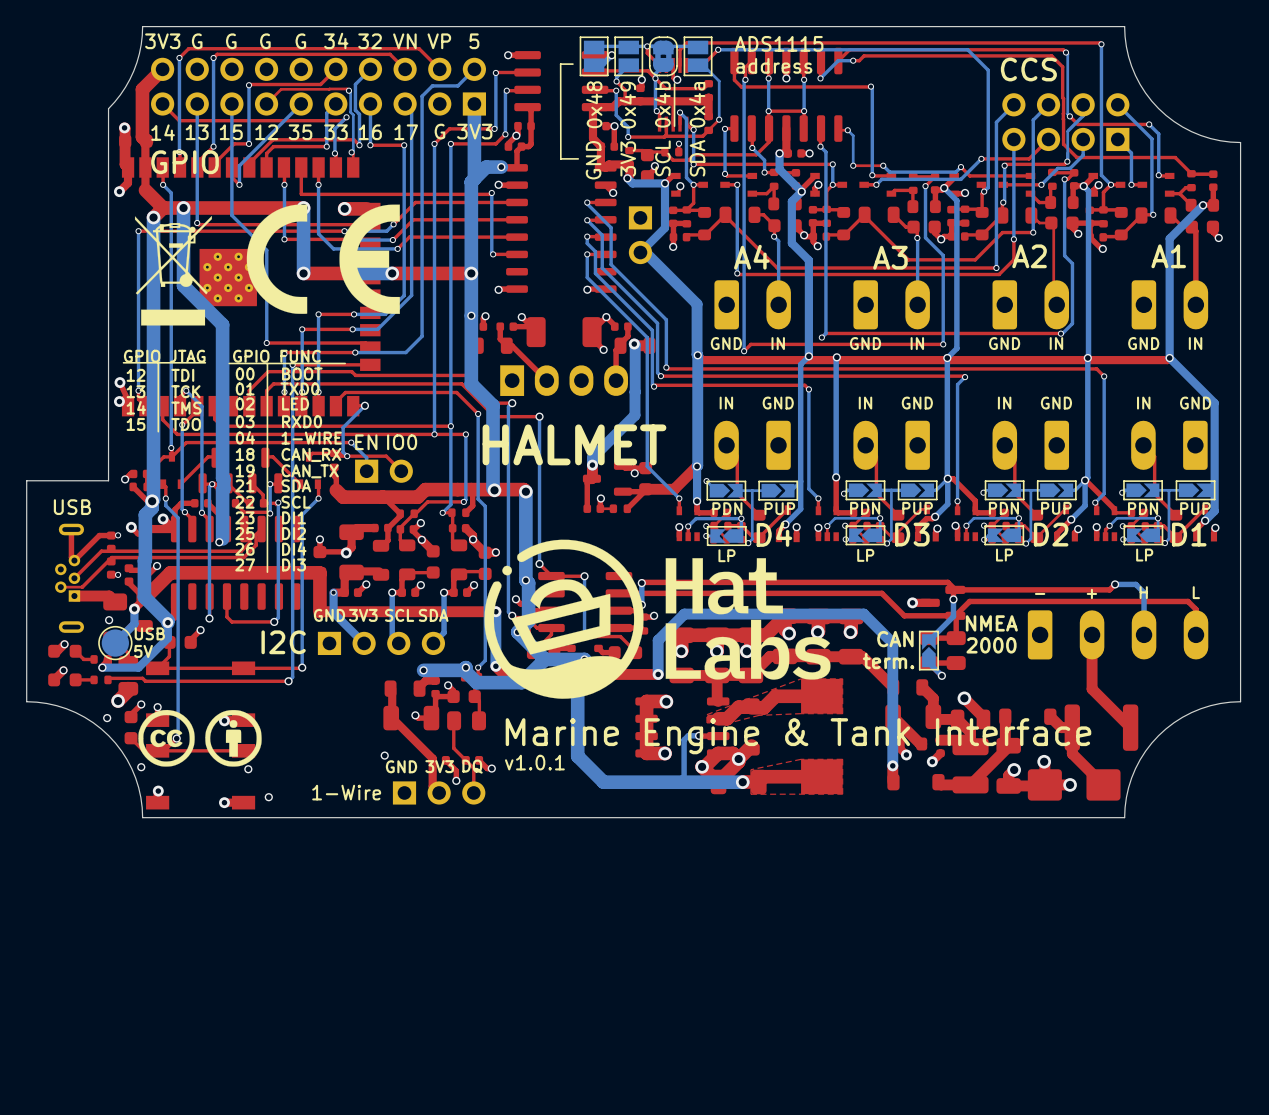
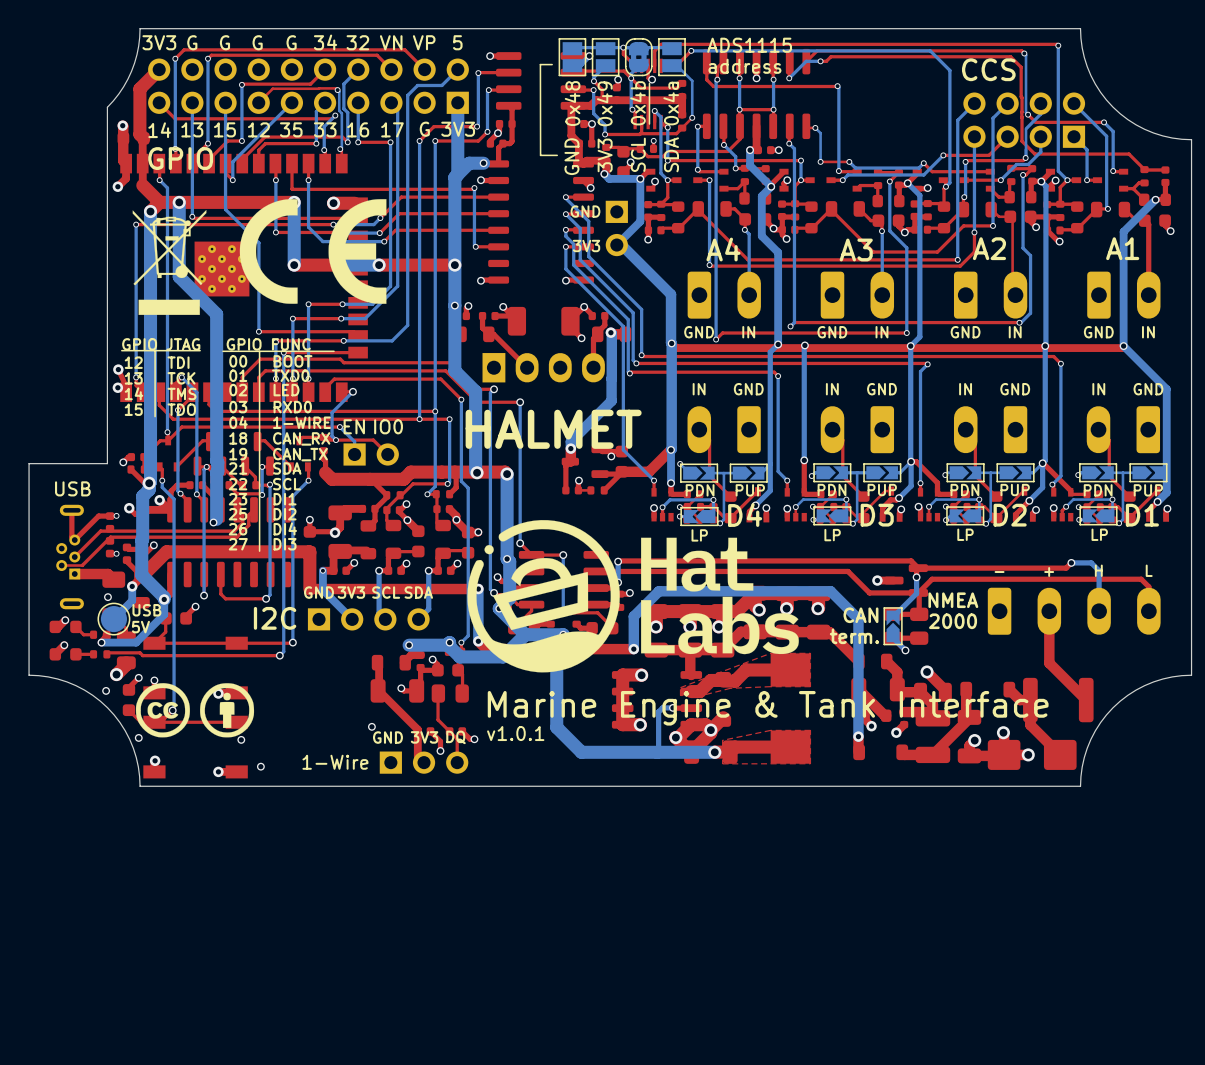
text: none -> GND (585, 211)
text: none -> 3V3 (586, 246)

